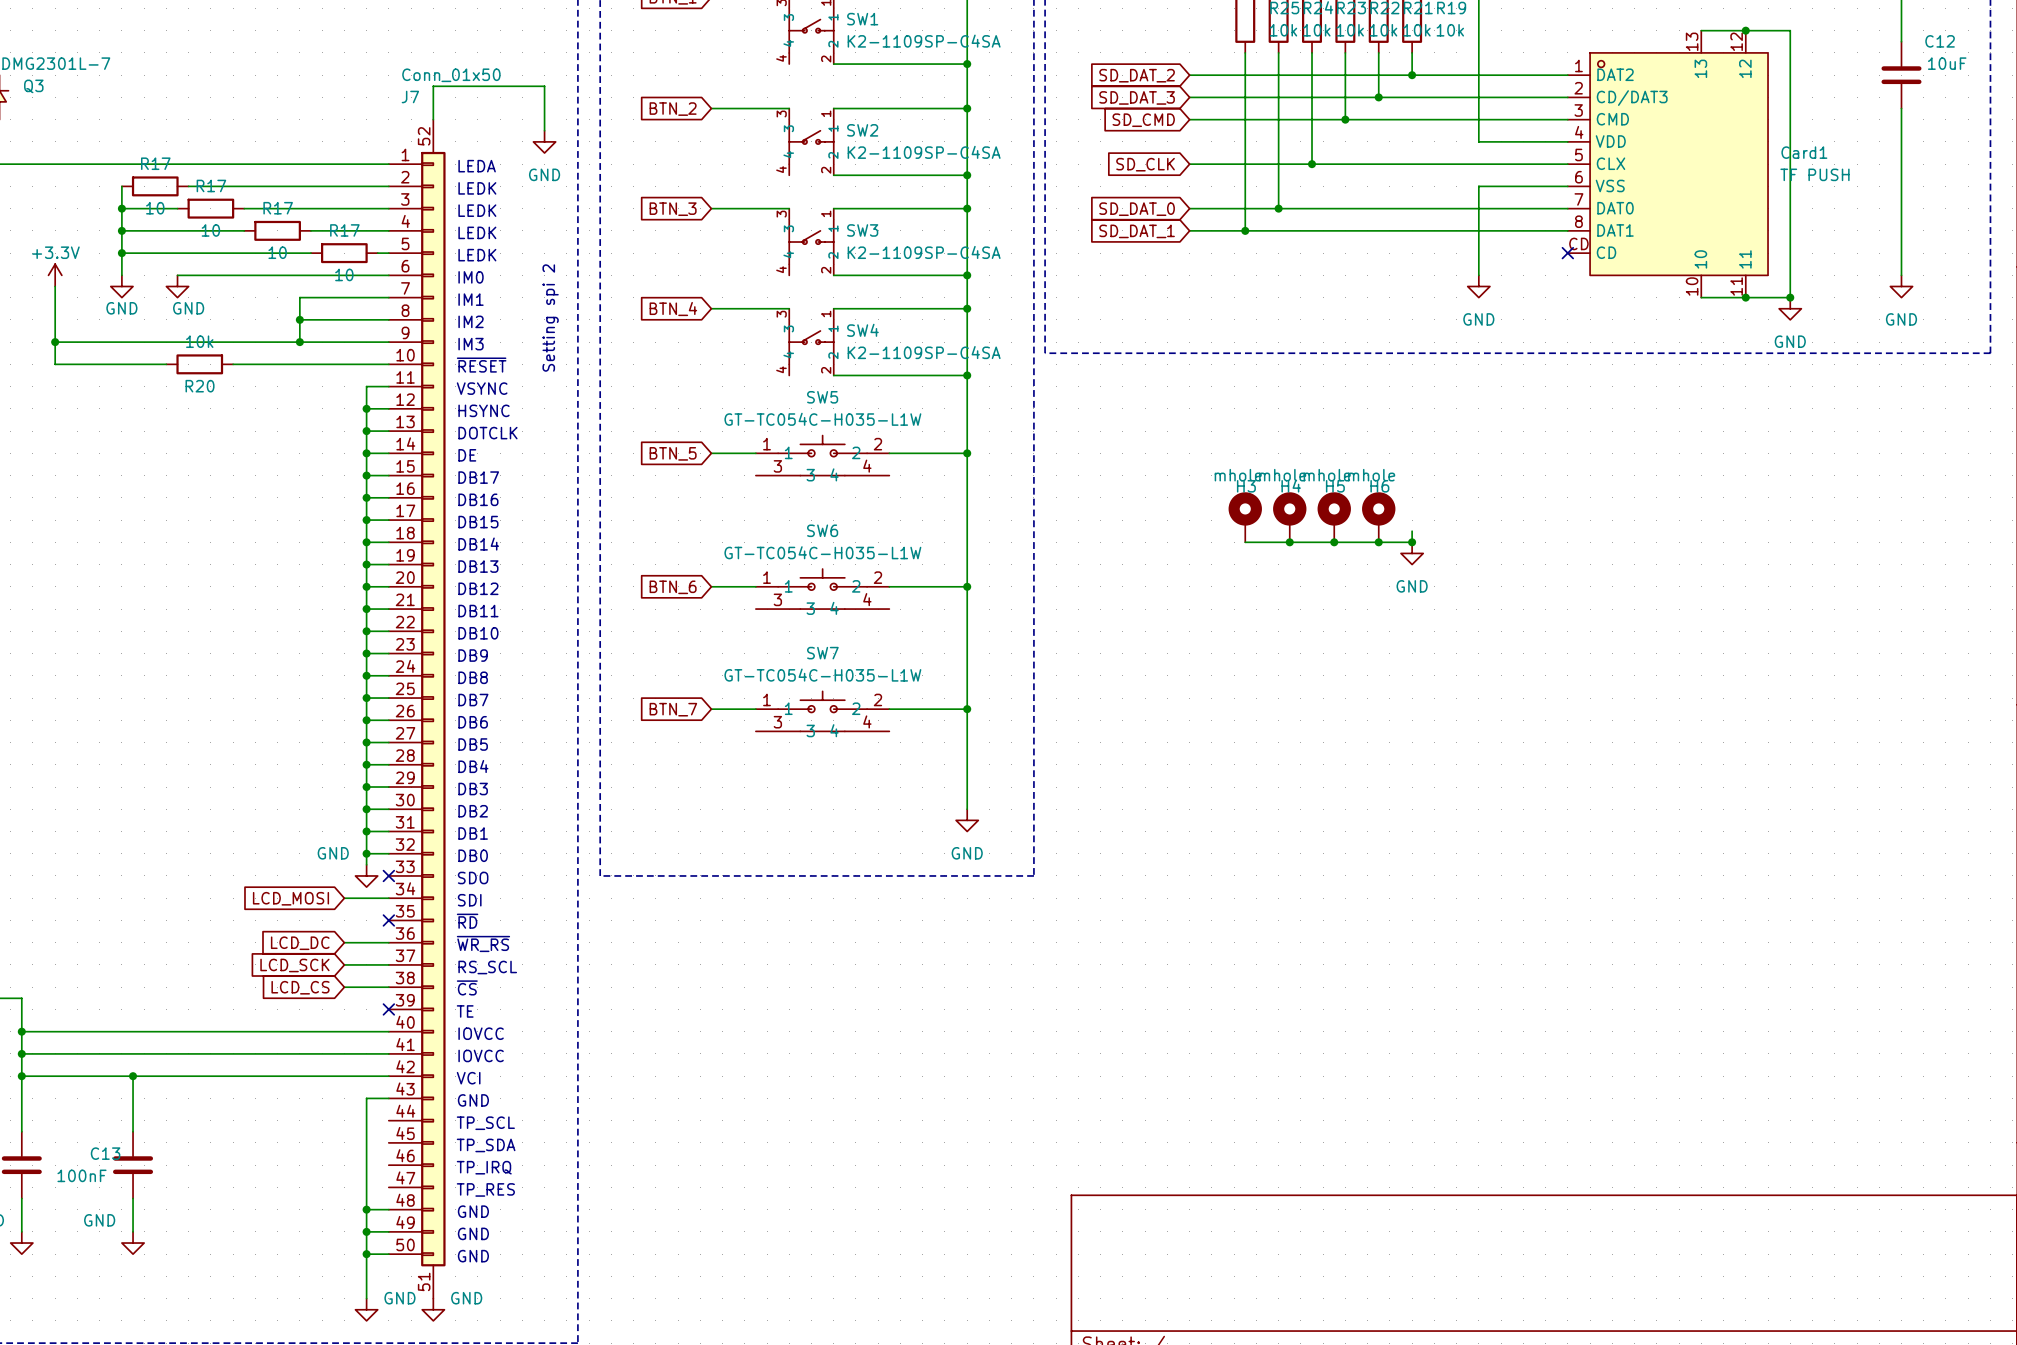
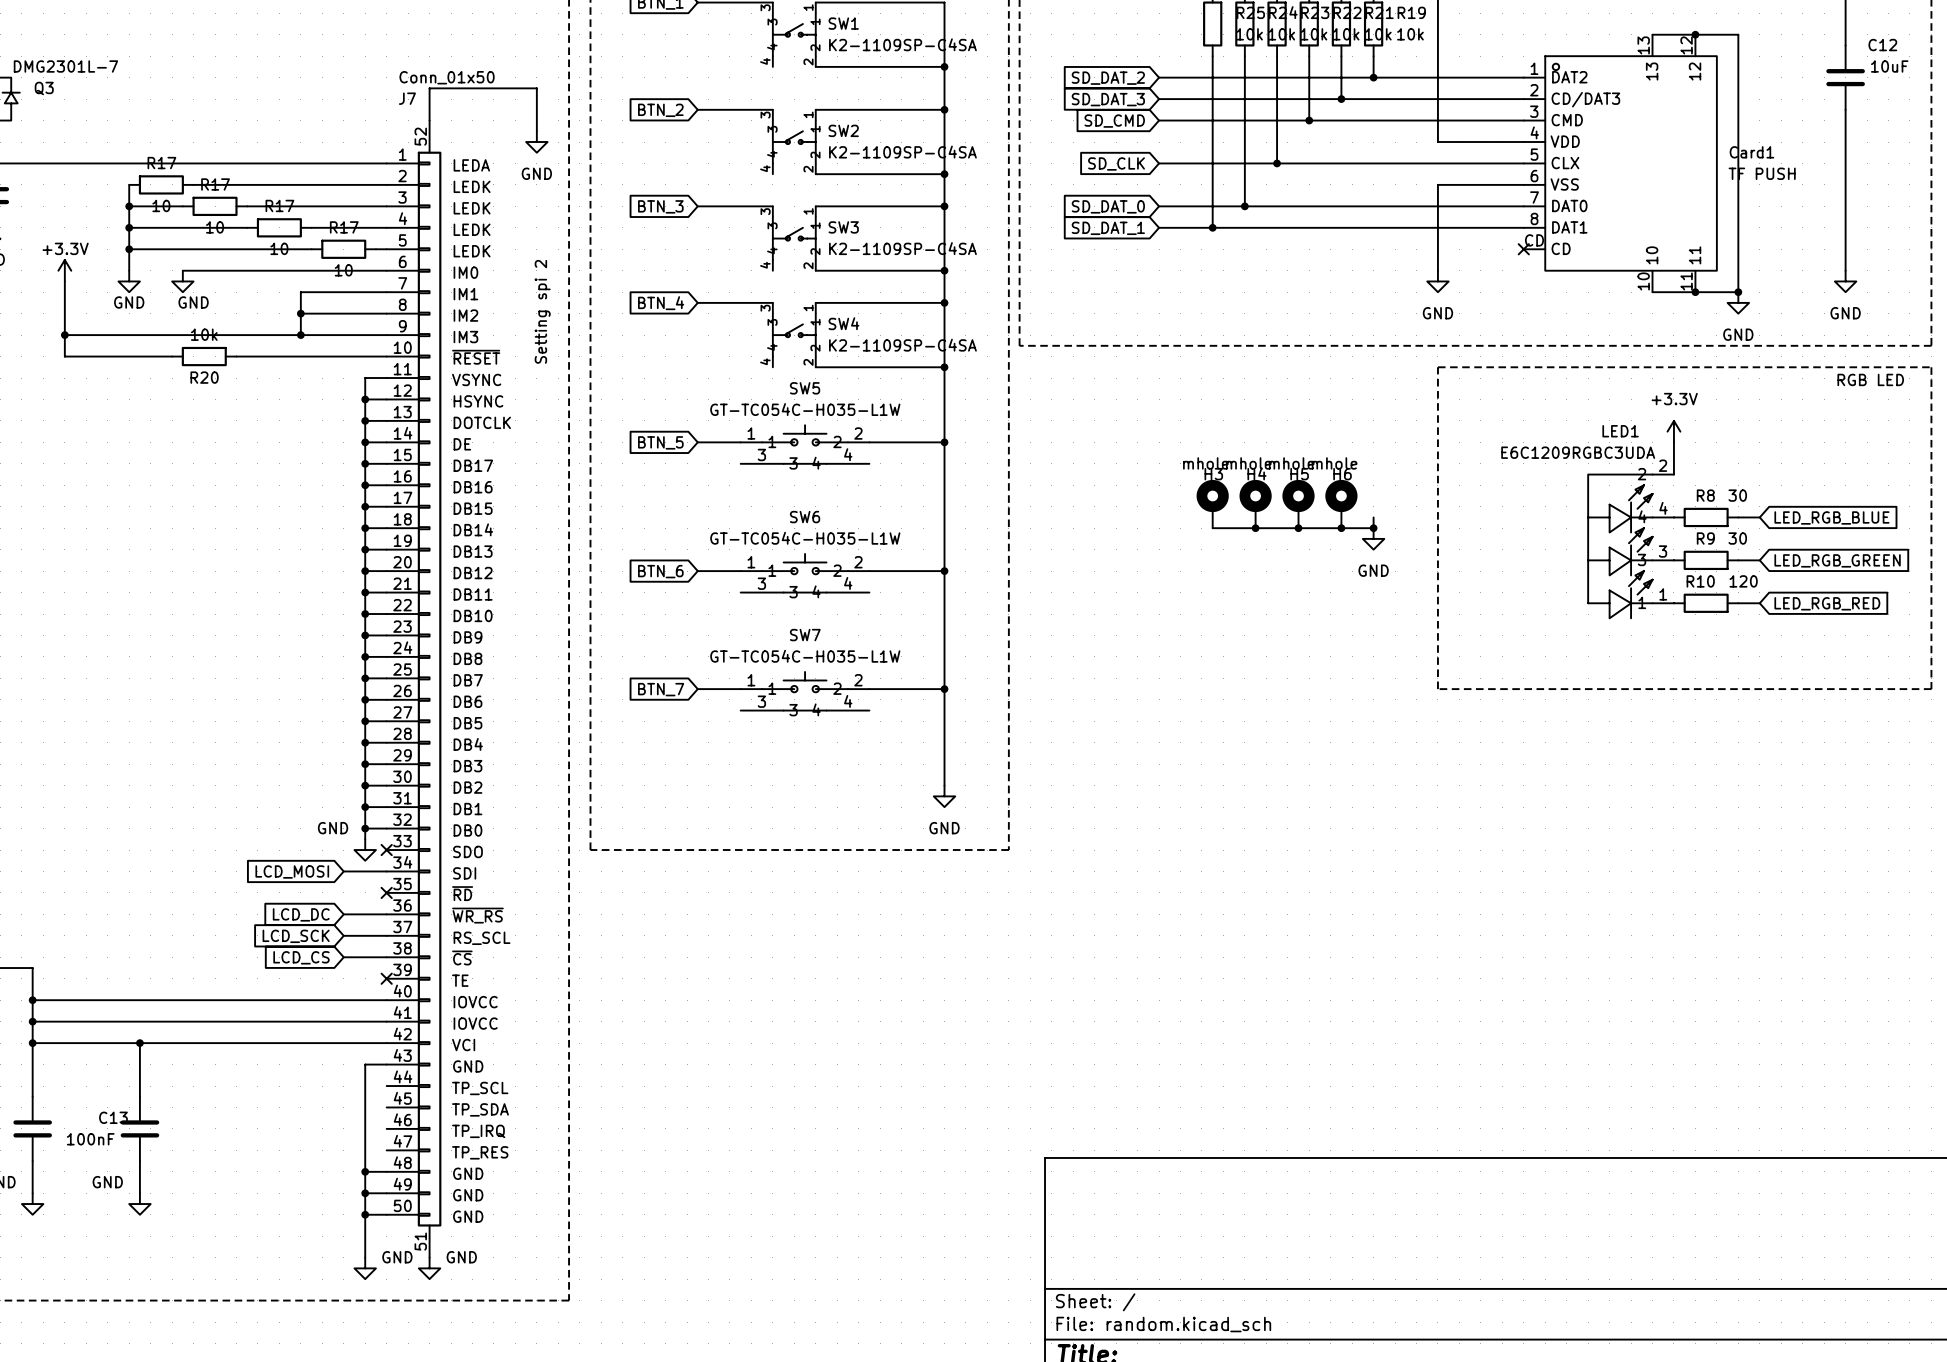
line: none -> (1437, 367) (1931, 367) (1931, 689) (1437, 689) (1437, 367)
text: none -> RGB LED (1870, 379)
power symbol: none -> +3.3V (1673, 431)
wire: none -> (1673, 442) (1673, 474)
R8: none -> 30 (1706, 517)
wire: none -> (1738, 517) (1759, 517)
global label: none -> LED_RGB_BLUE (1831, 517)
LED1: none -> E6C1209RGBC3UDA (1631, 546)
R9: none -> 30 (1706, 560)
wire: none -> (1738, 560) (1759, 560)
global label: none -> LED_RGB_GREEN (1837, 560)
R10: none -> 120 (1706, 603)
wire: none -> (1738, 603) (1759, 603)
global label: none -> LED_RGB_RED (1827, 603)

